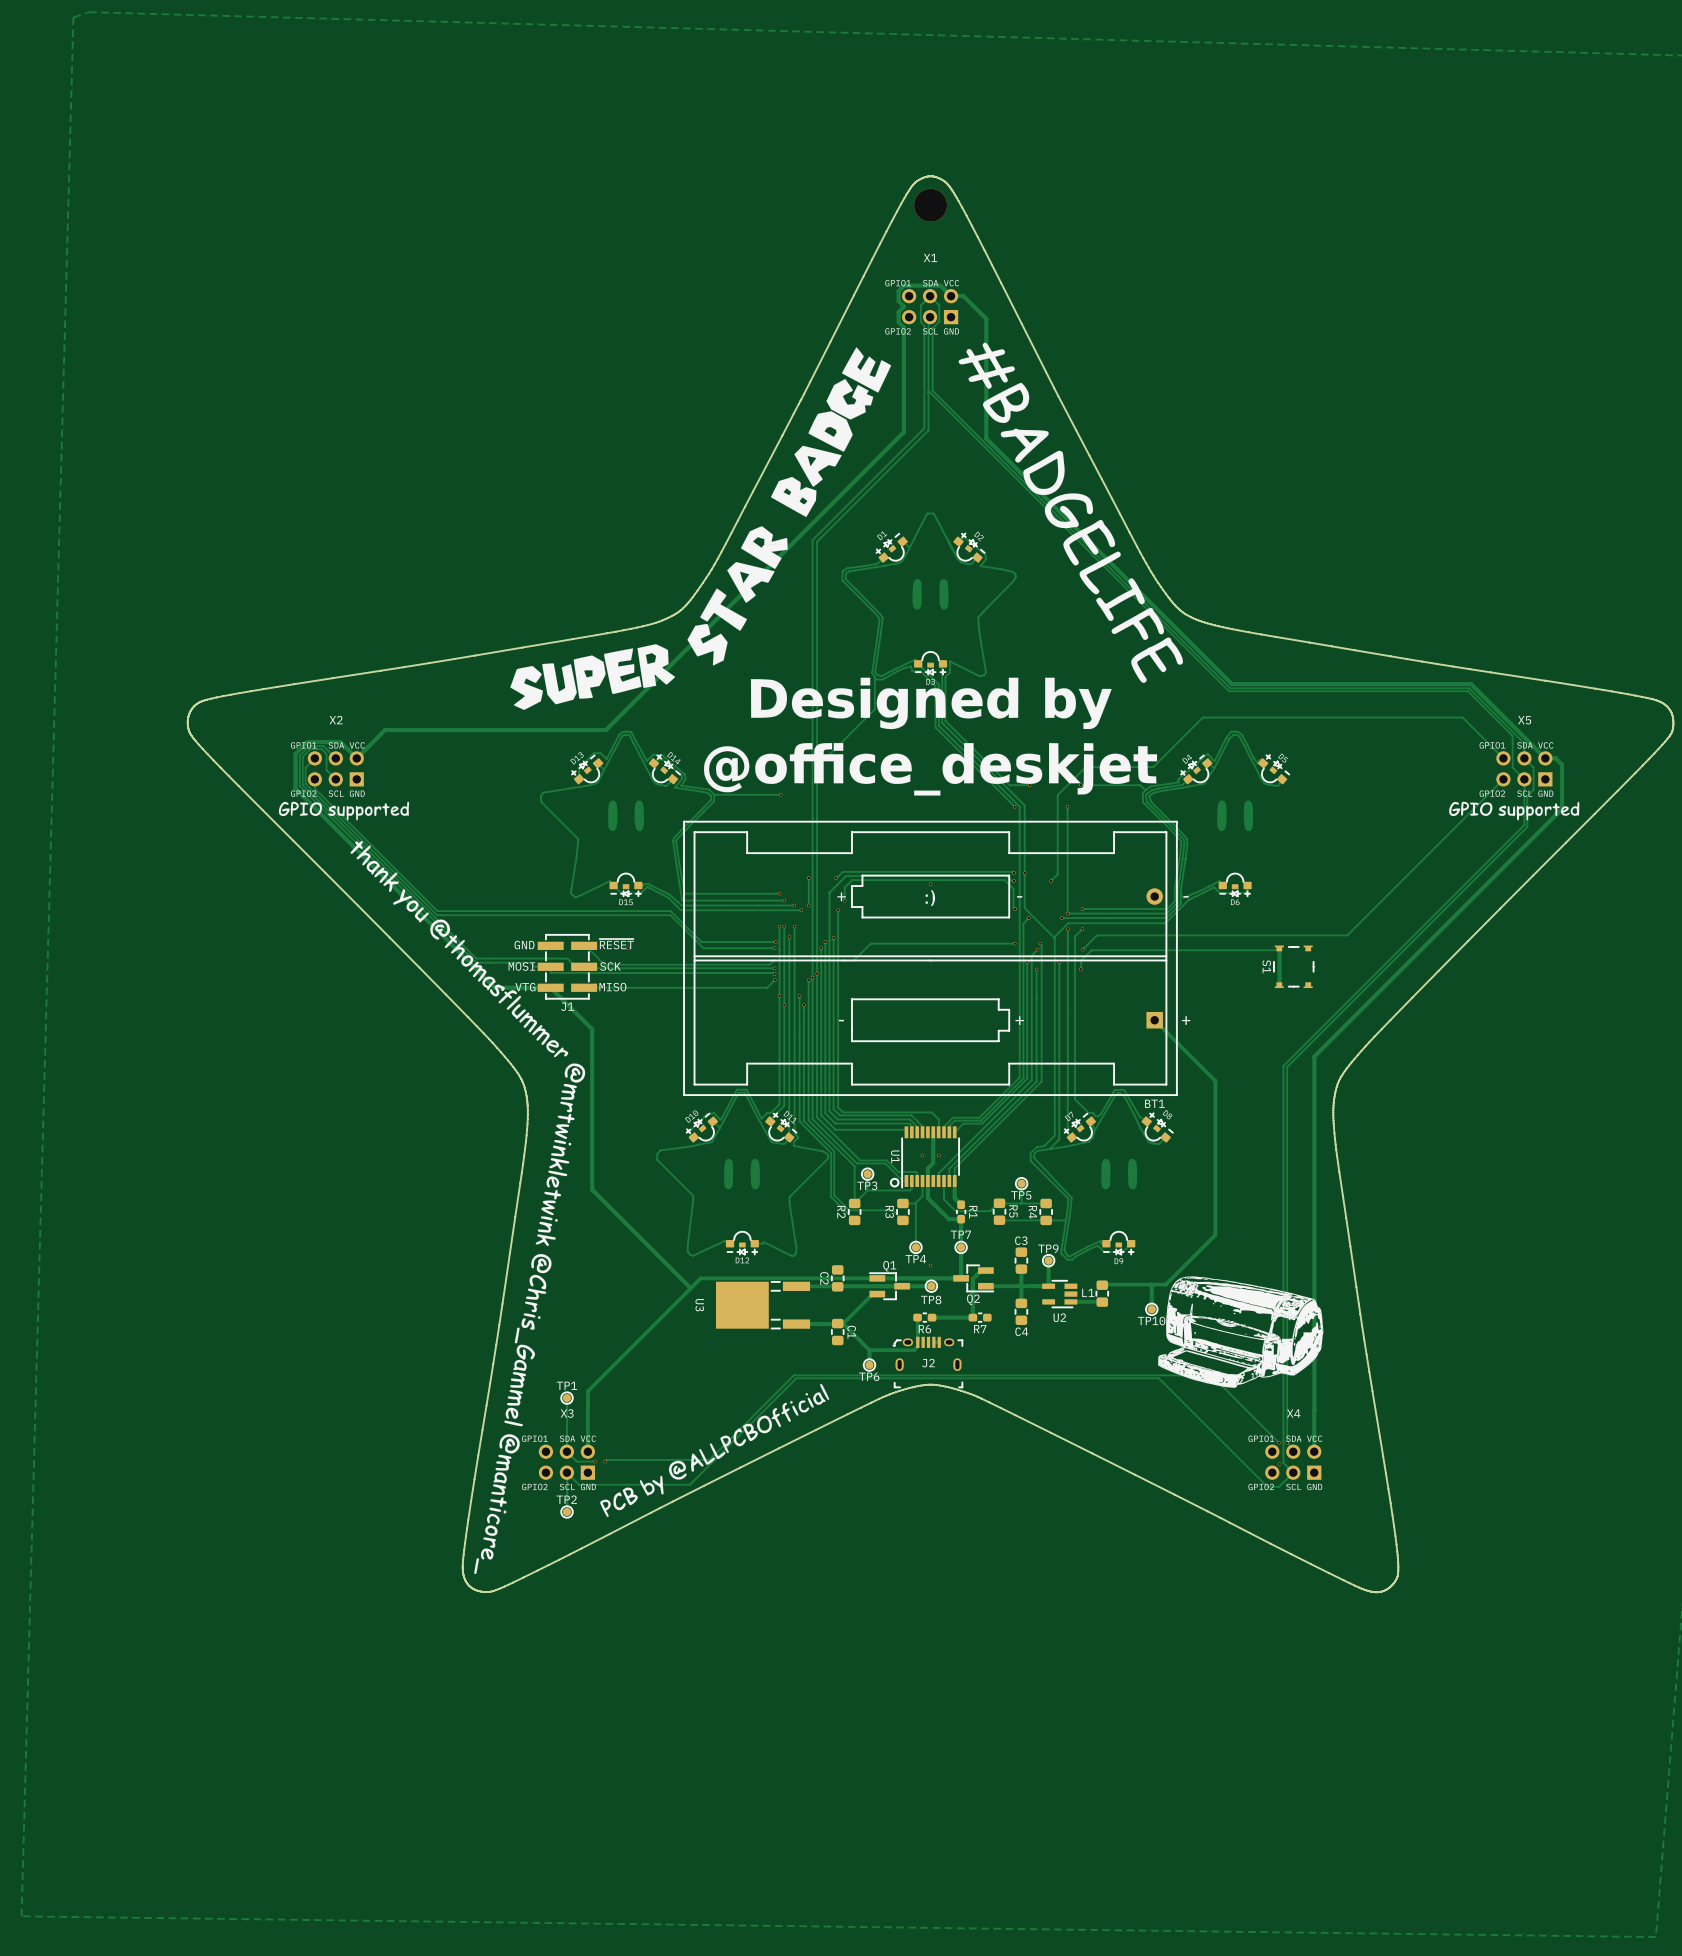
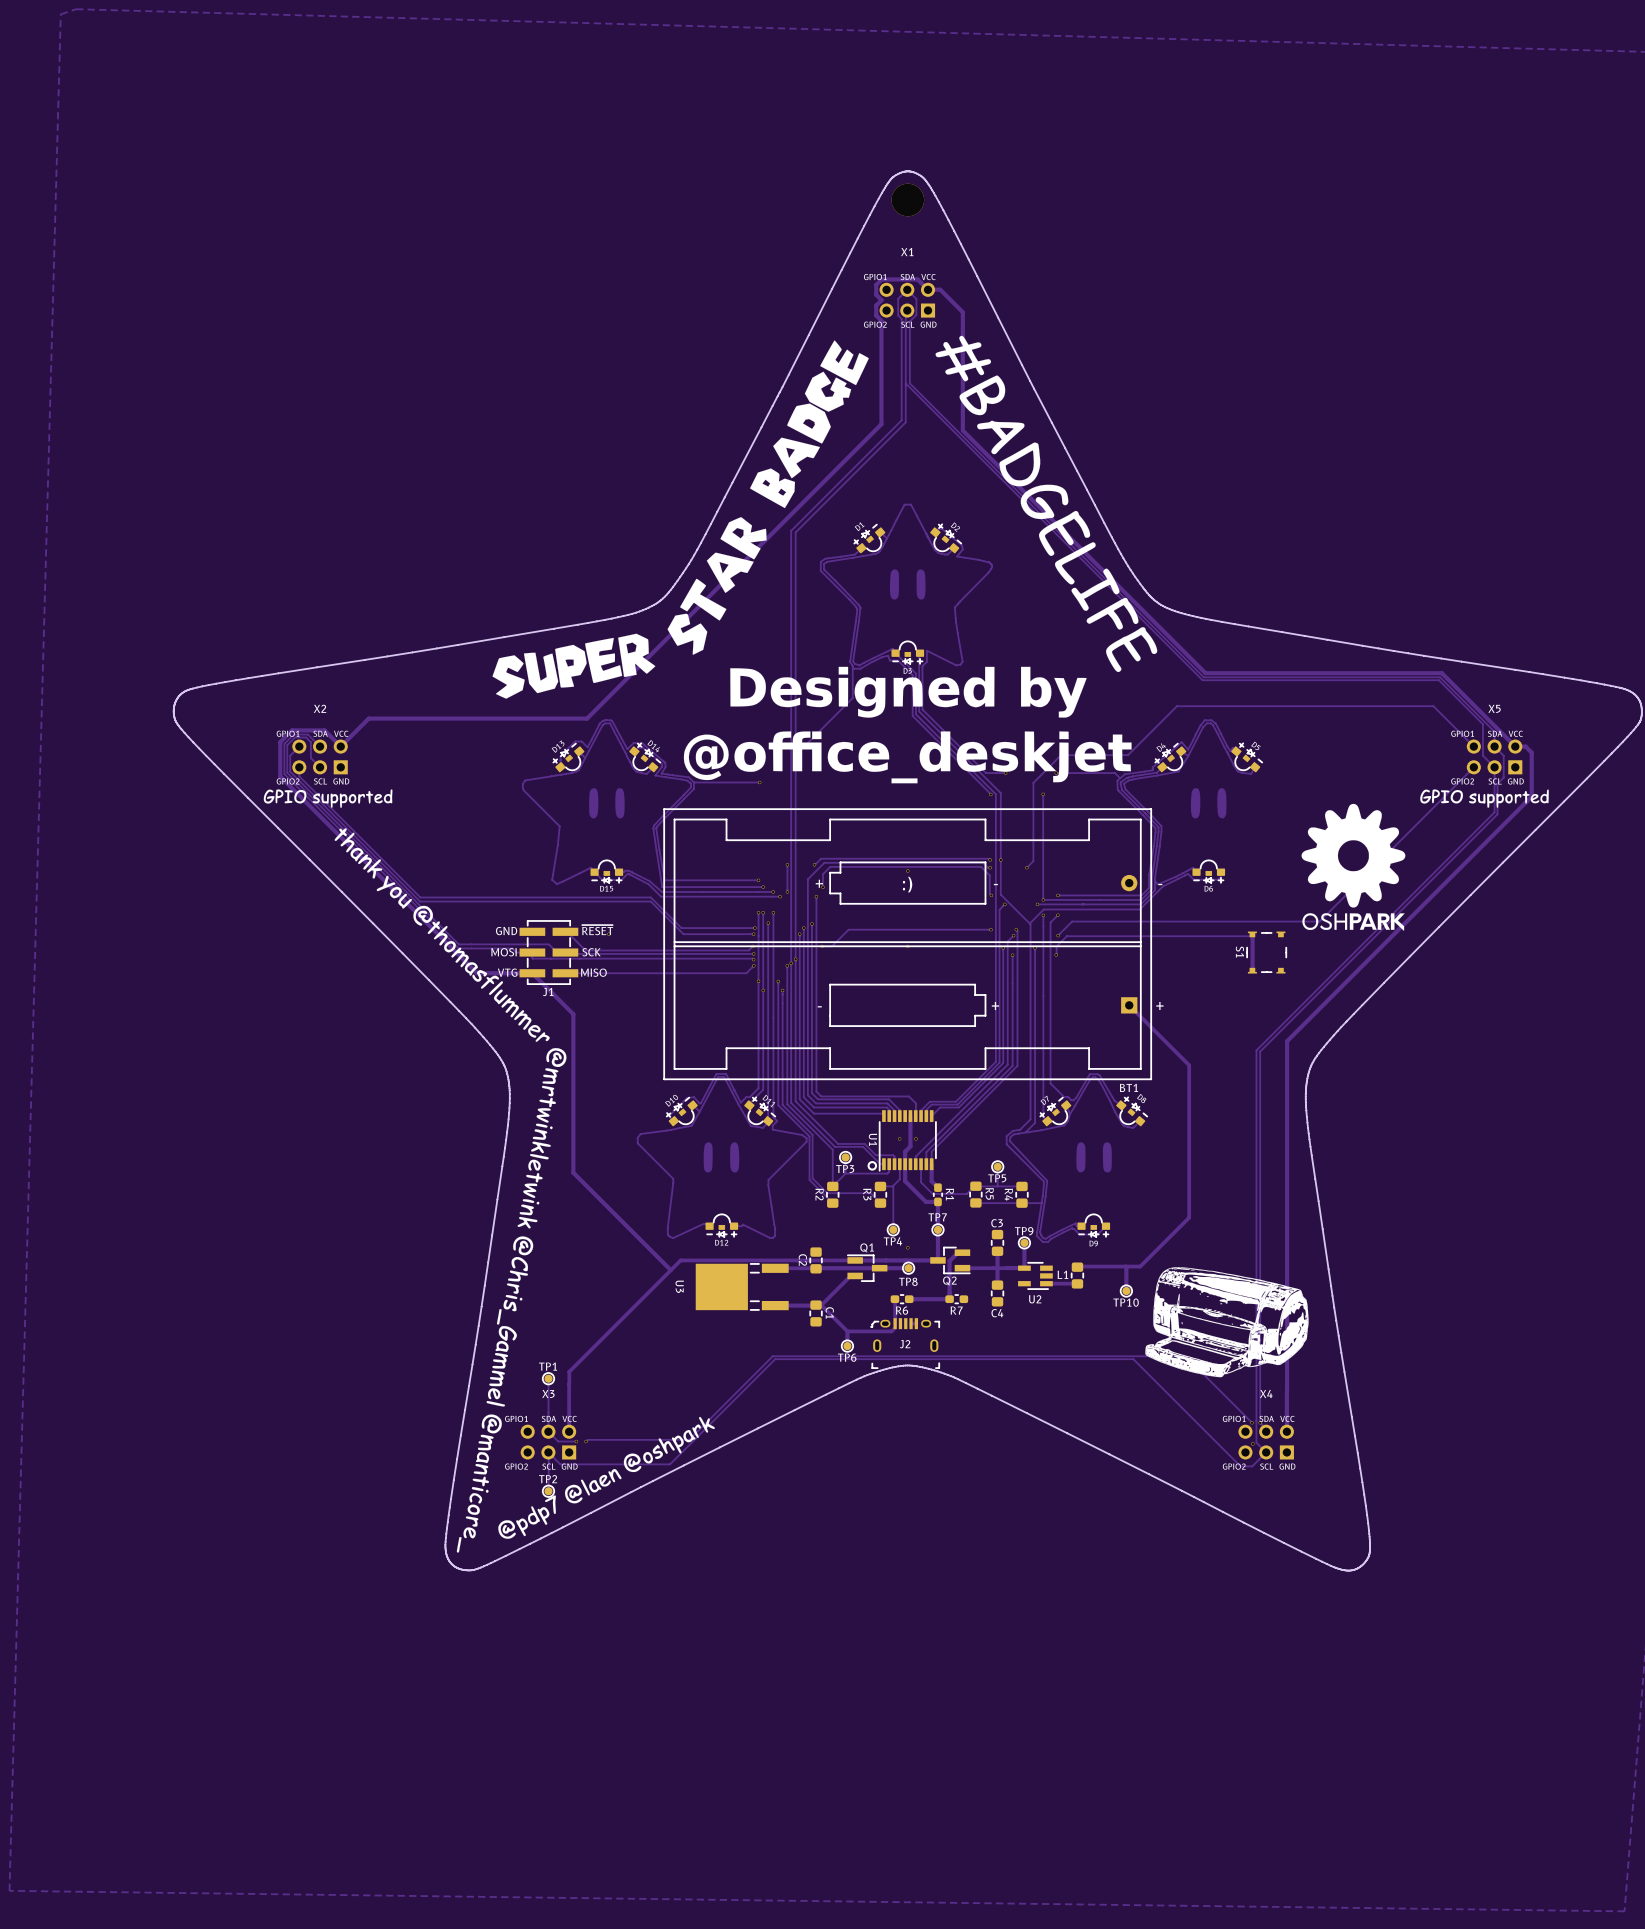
drawing shape: [278, 342, 1580, 1575] -> [263, 335, 1549, 1553]
drawing: none -> [1301, 803, 1406, 931]

